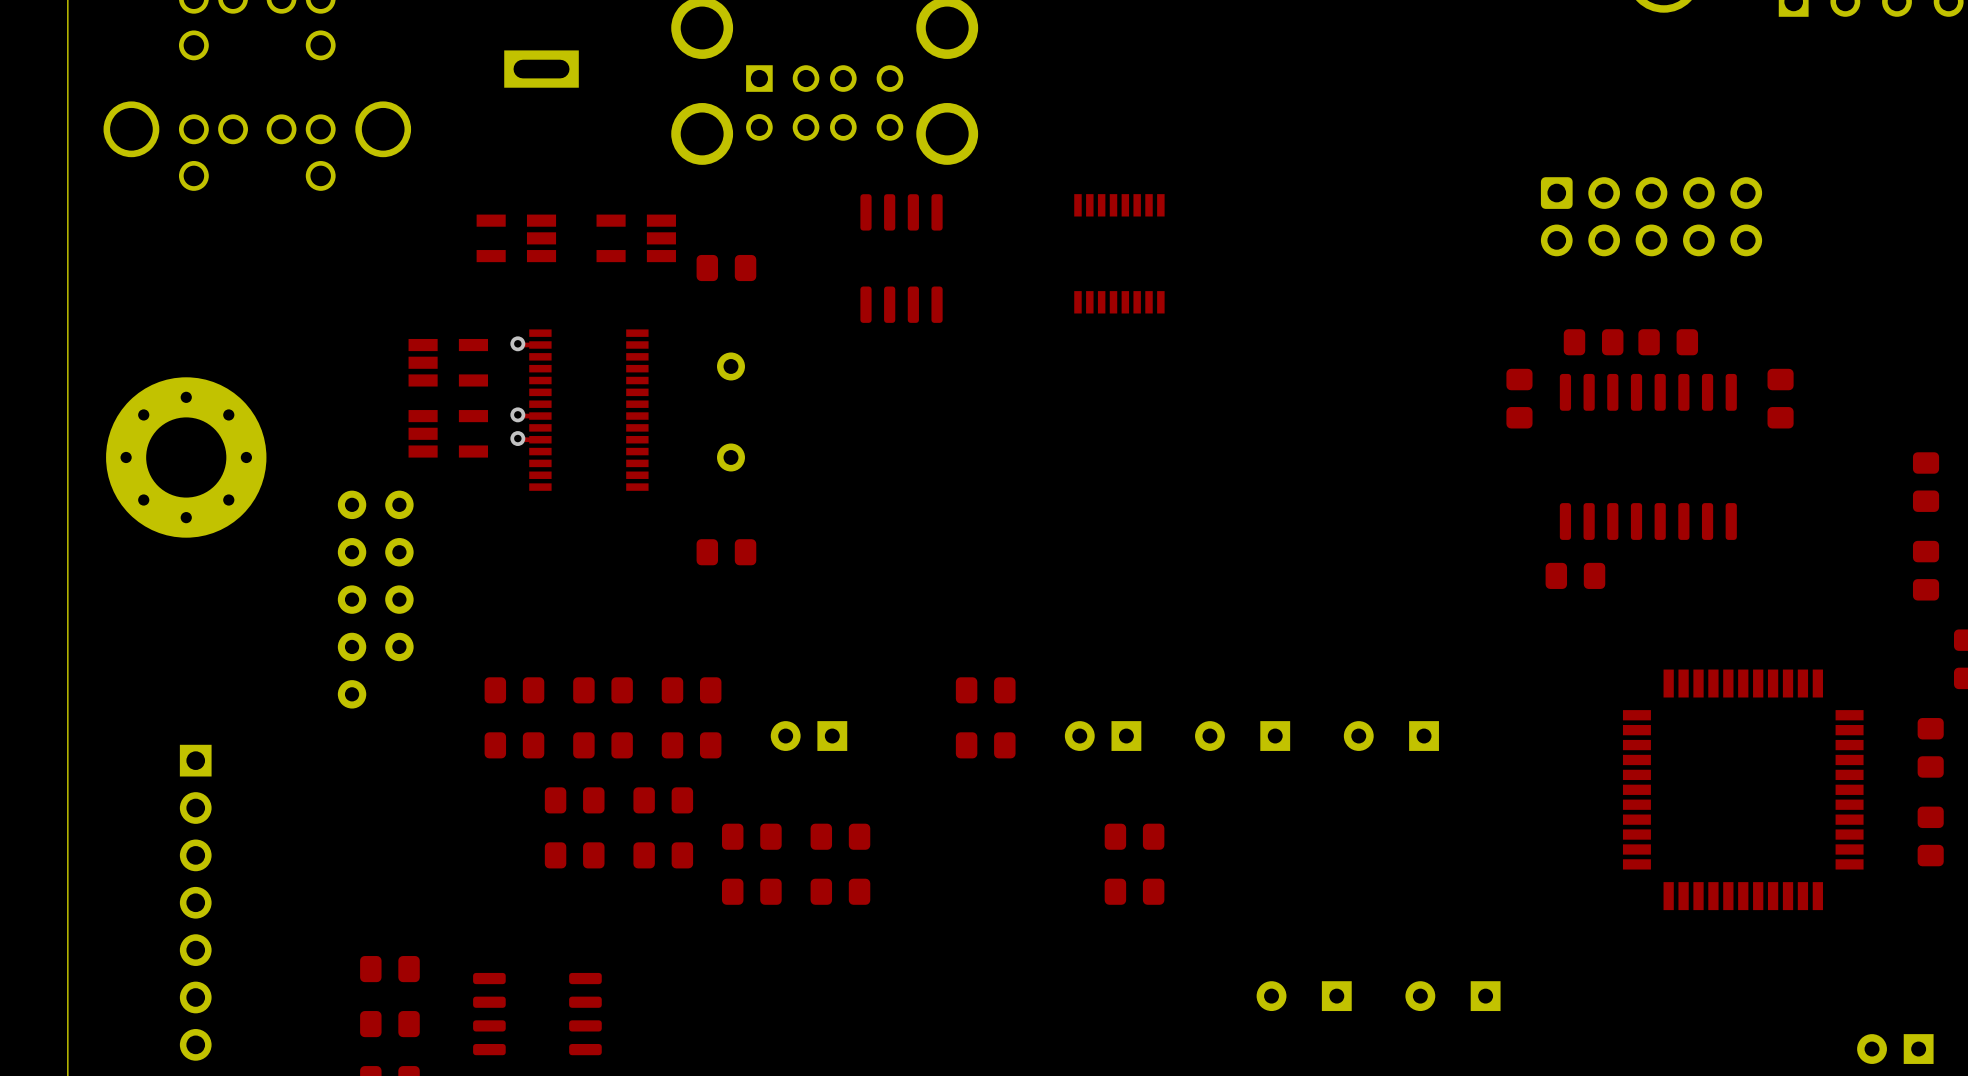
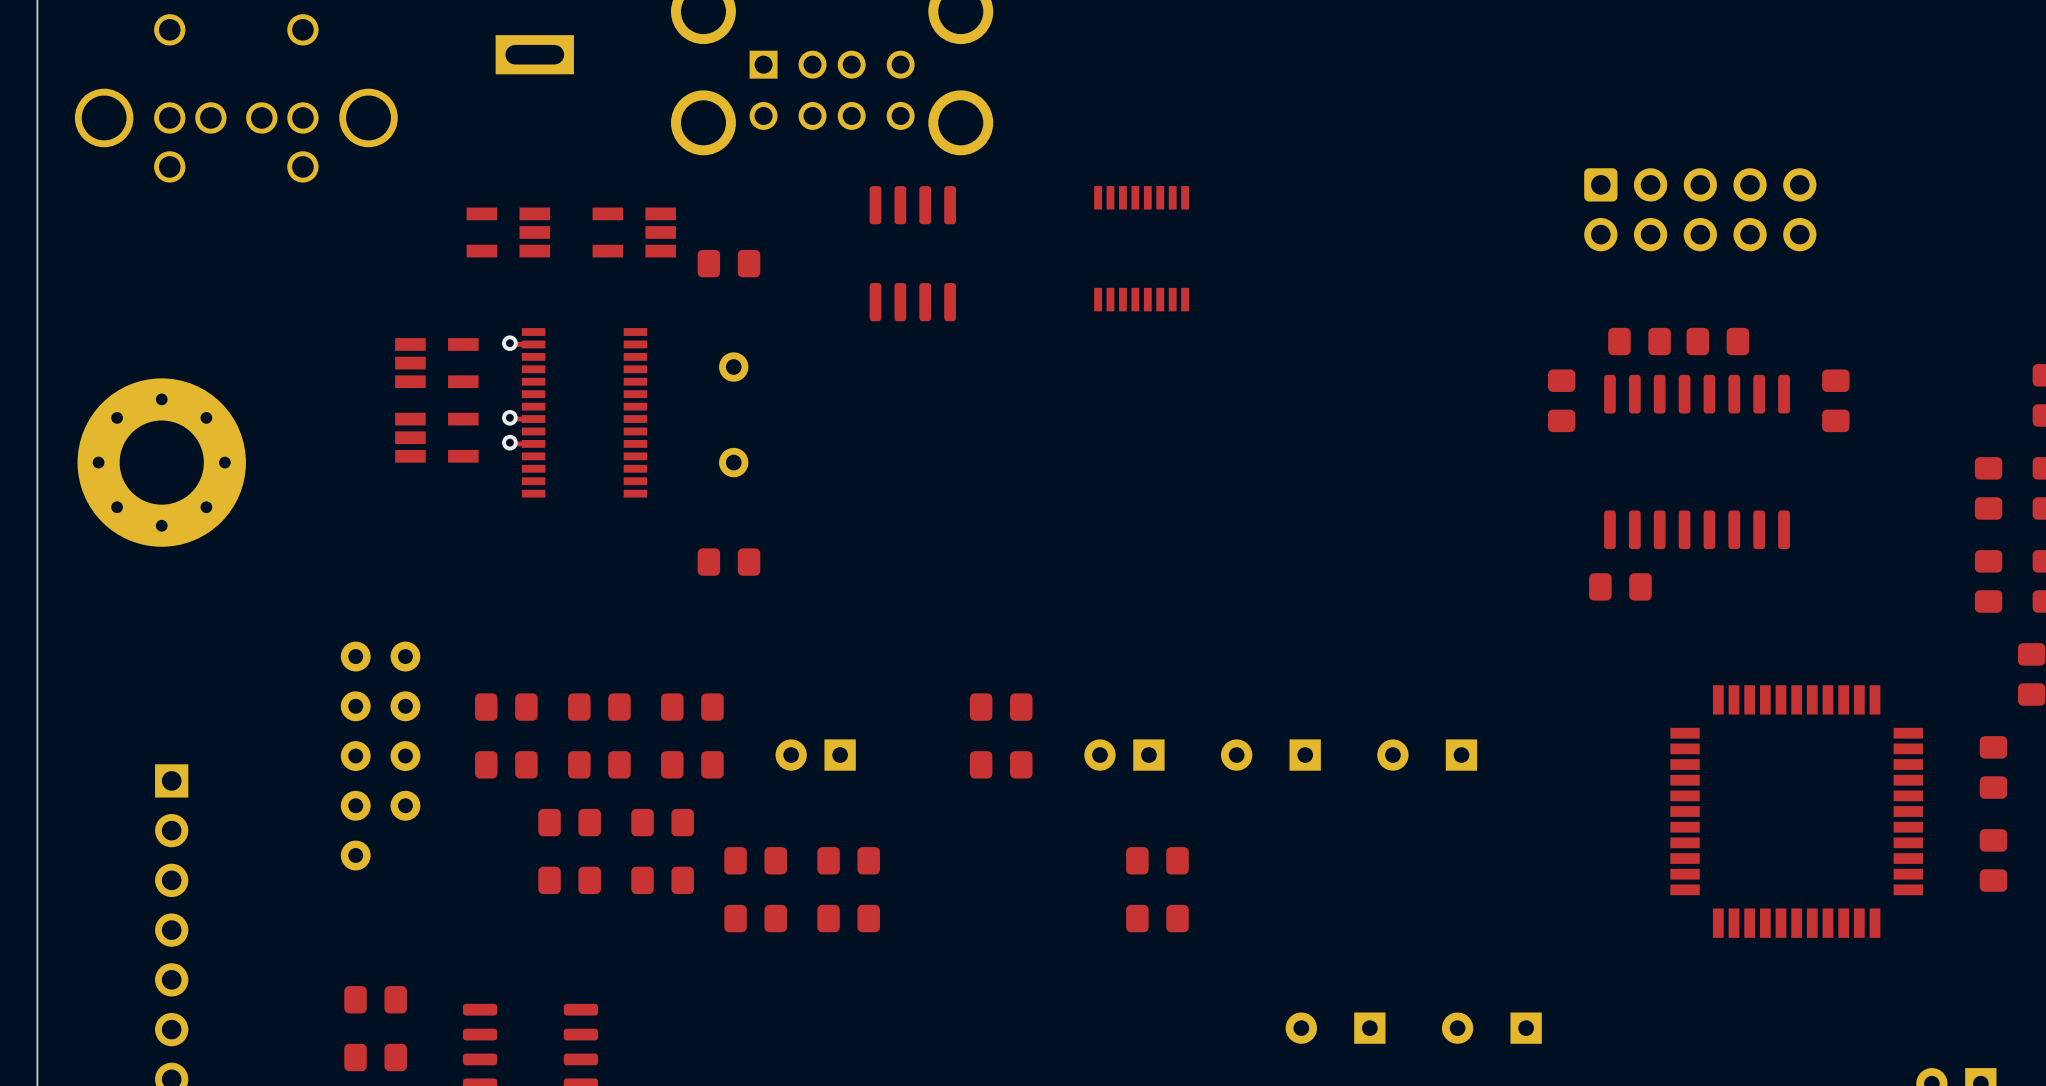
part position: (375, 599) -> (380, 756)

